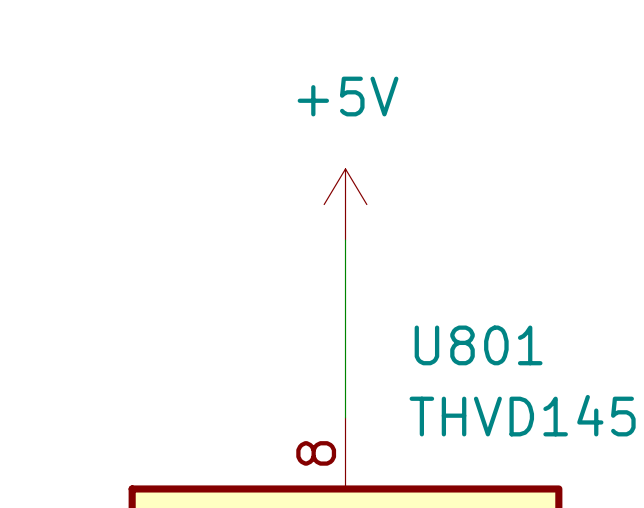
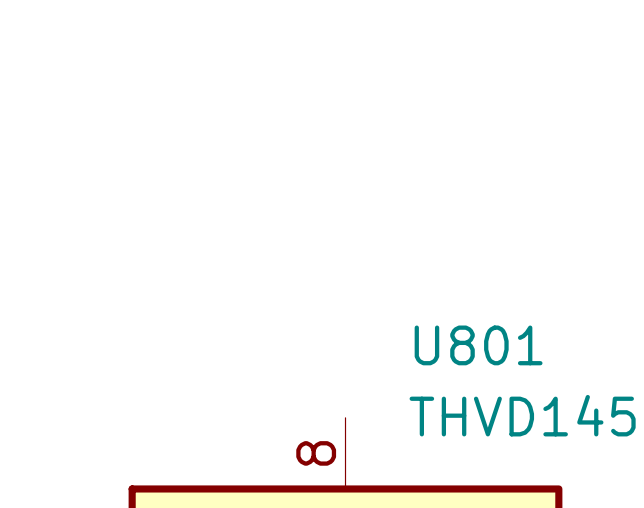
power symbol: +5V (345, 204) -> none
wire: (345, 240) (345, 417) -> none

